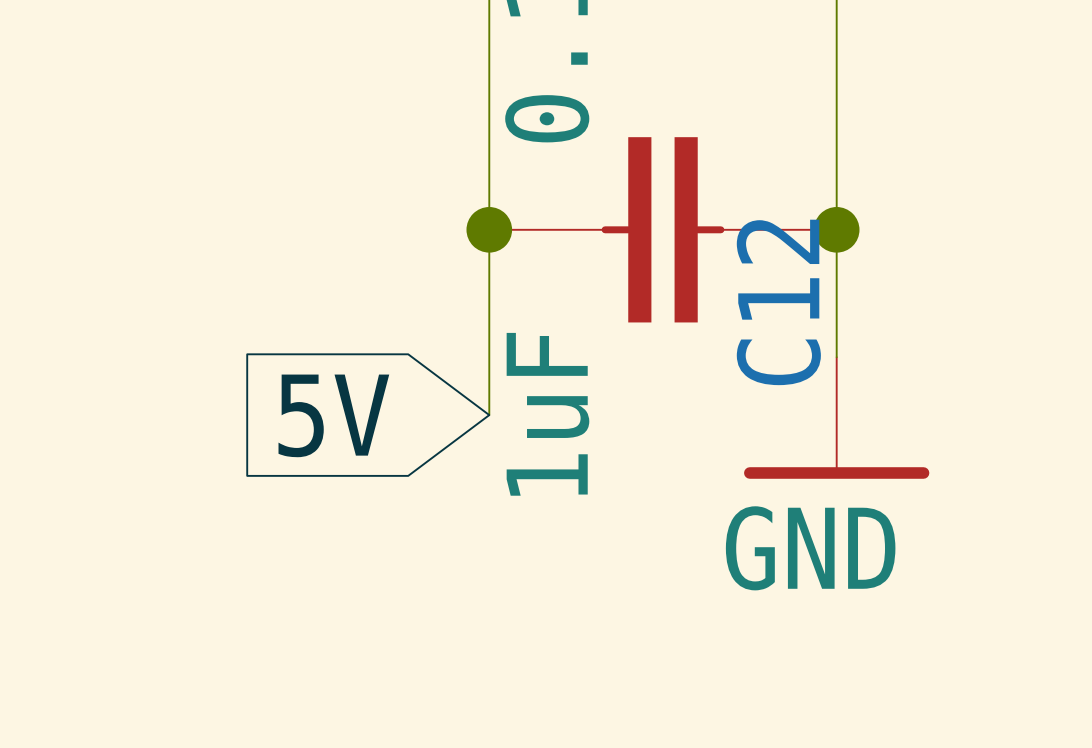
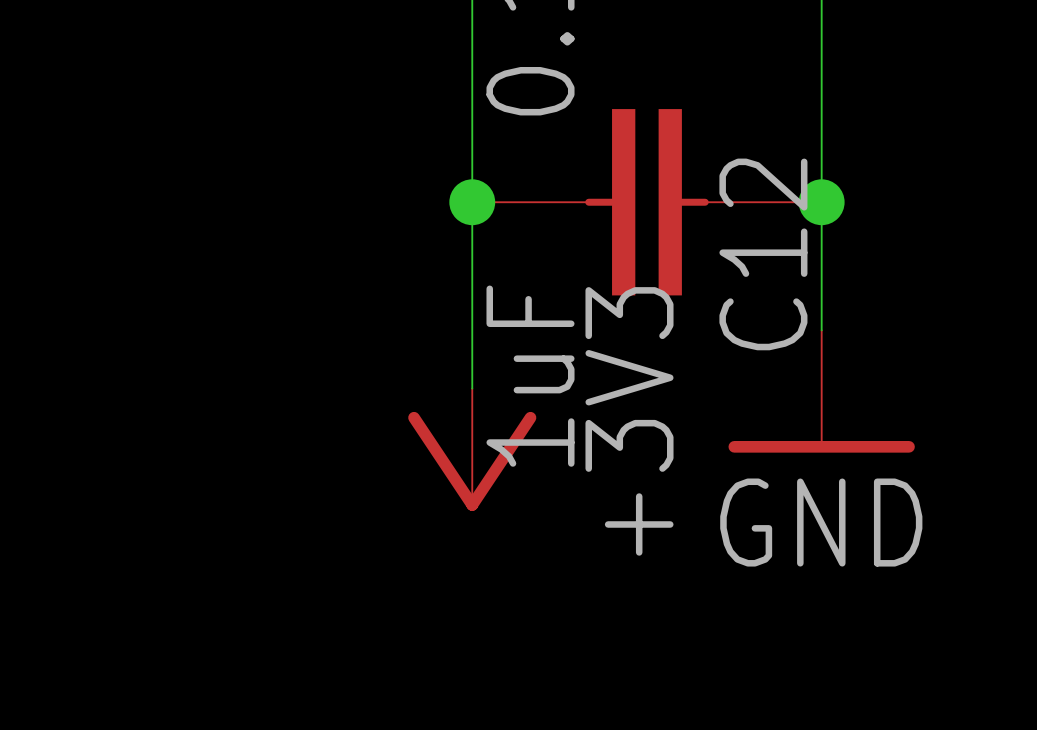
global label: 5V (333, 415) -> none
power symbol: none -> +3V3 (472, 449)

